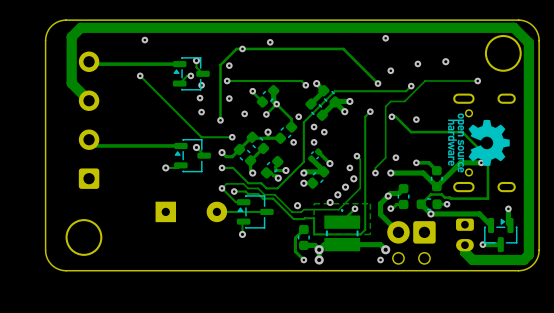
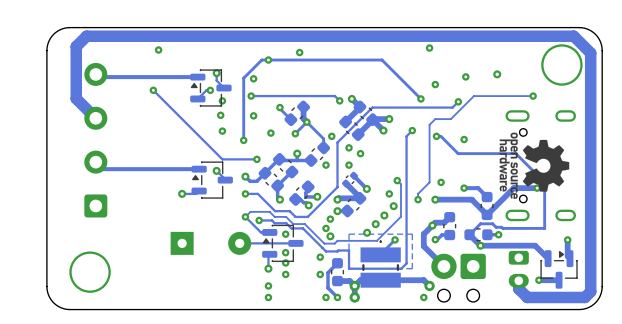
via: none -> (330, 219)
via: none -> (325, 228)
via: none -> (285, 234)
via: none -> (285, 252)
via: none -> (320, 257)
via: none -> (285, 262)
via: none -> (285, 274)
via: none -> (320, 274)
via: none -> (268, 285)
via: none -> (268, 297)
via: none -> (325, 297)

